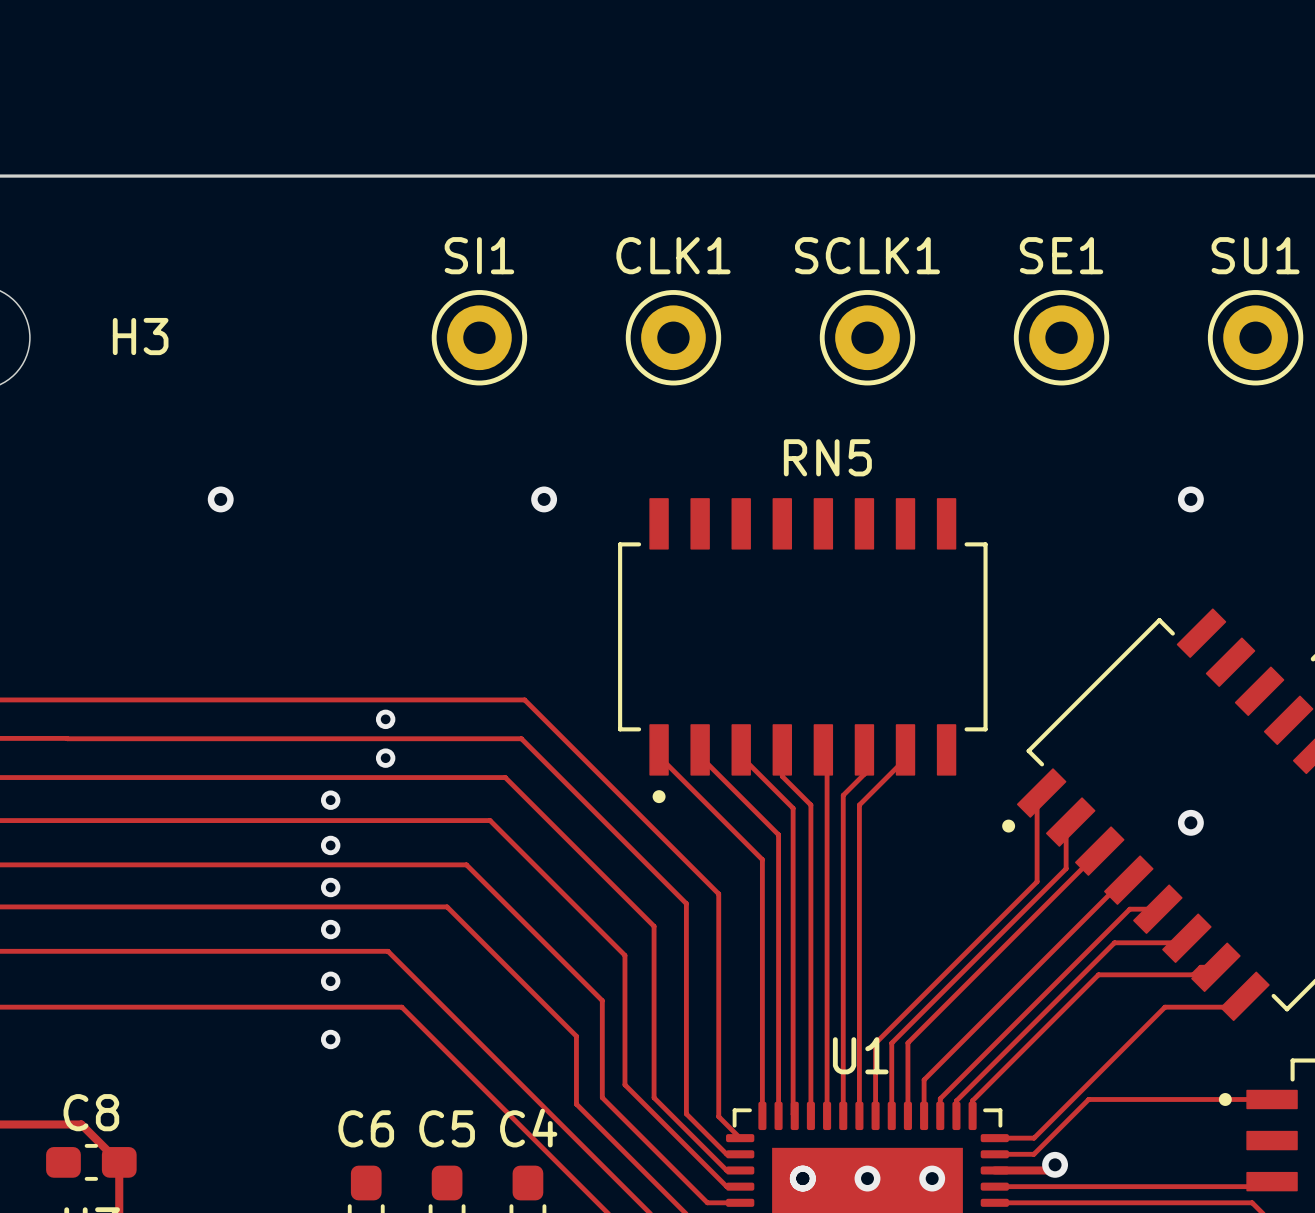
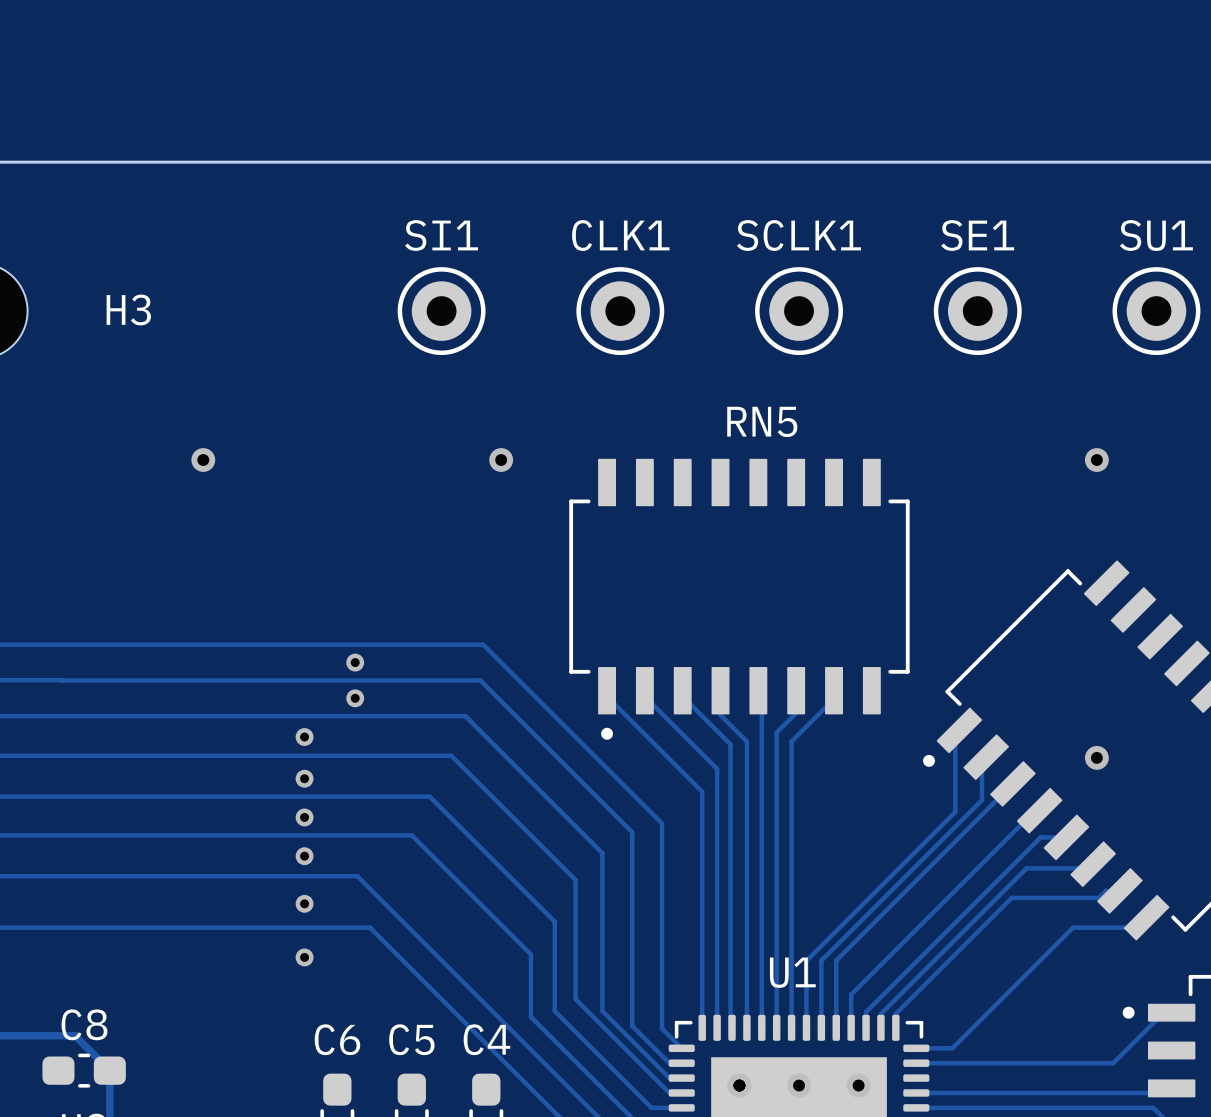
track: (1263, 1099) (1088, 1099) (1033, 1154) -> (1163, 1012) (1113, 1063) (952, 1063)
track: (1055, 1164) (1049, 1170) (994, 1170) -> none
via: (1055, 1164) -> none

